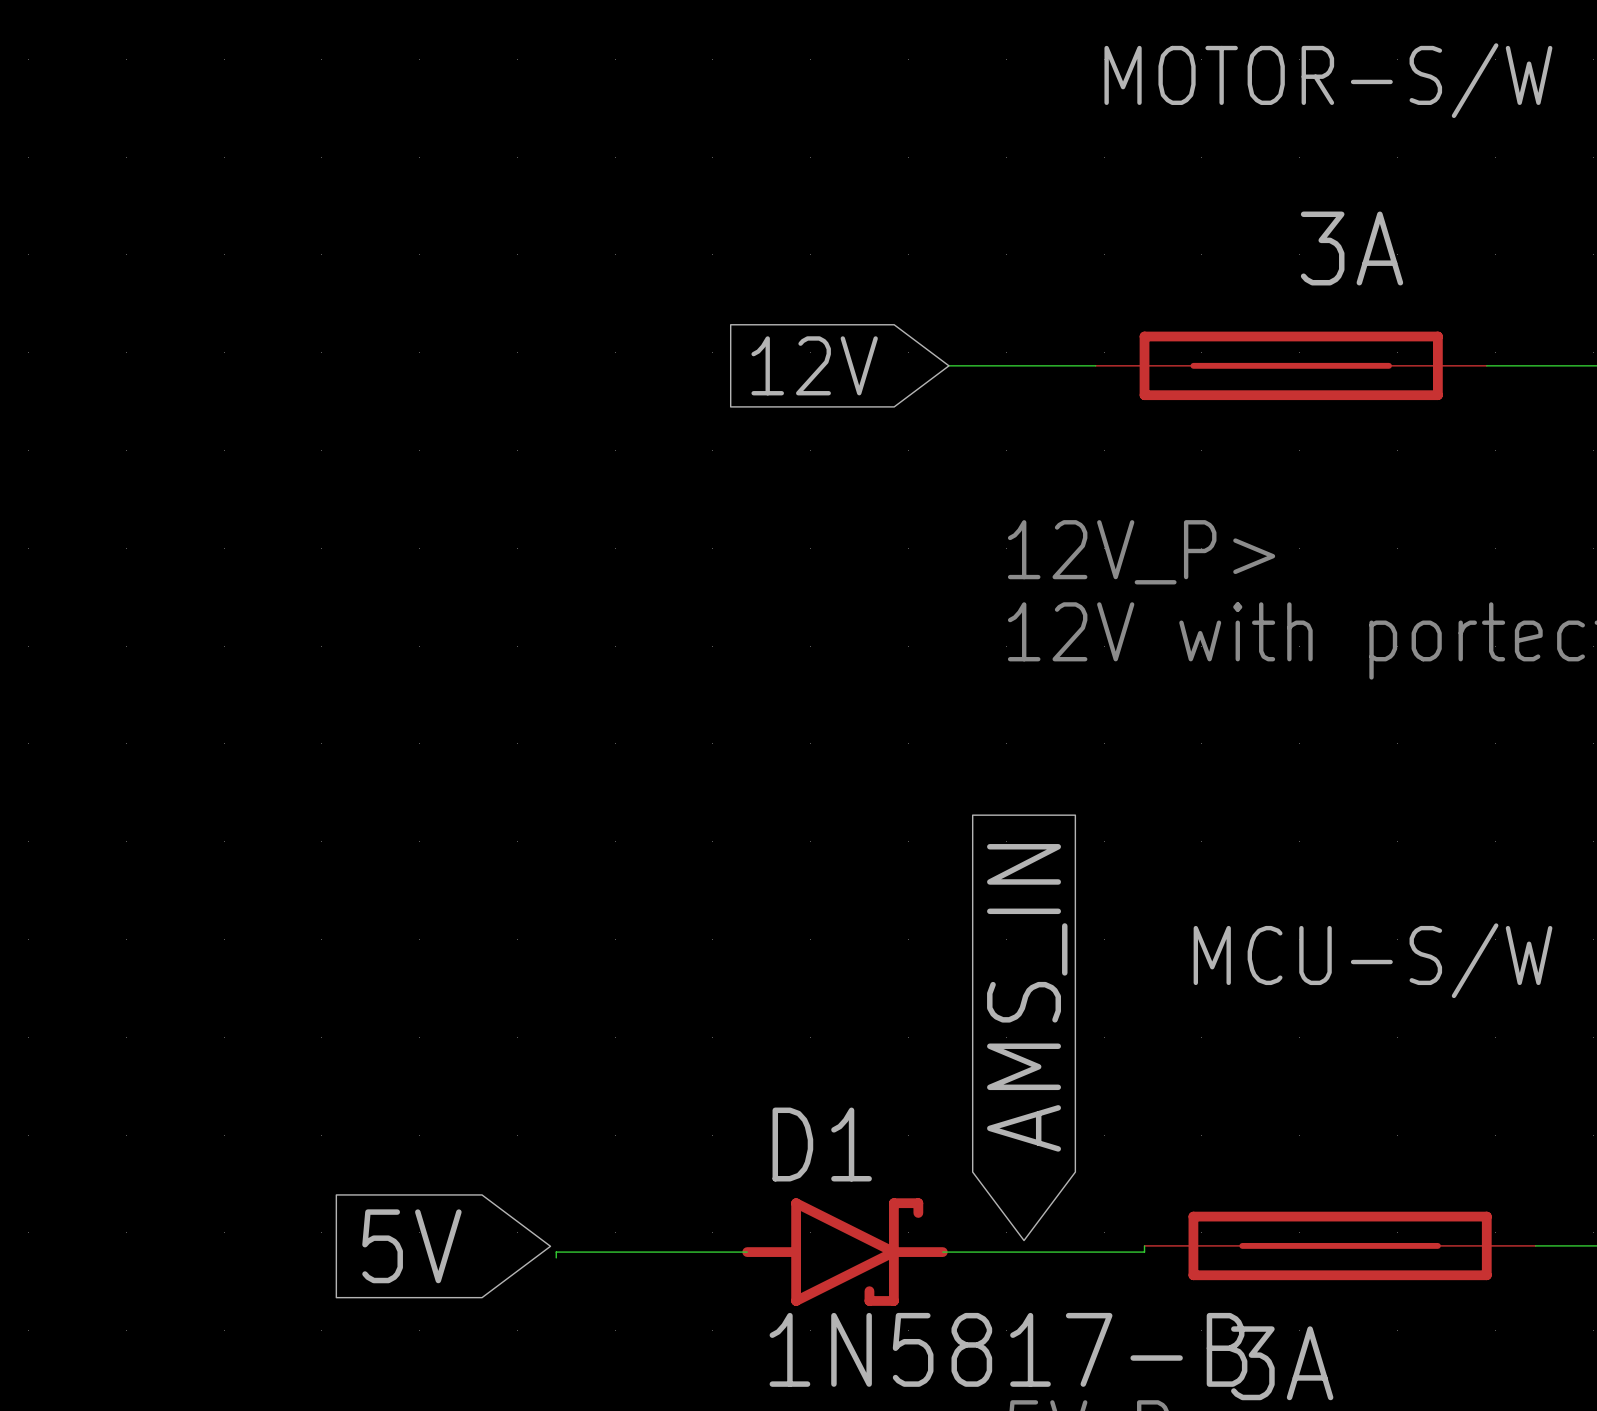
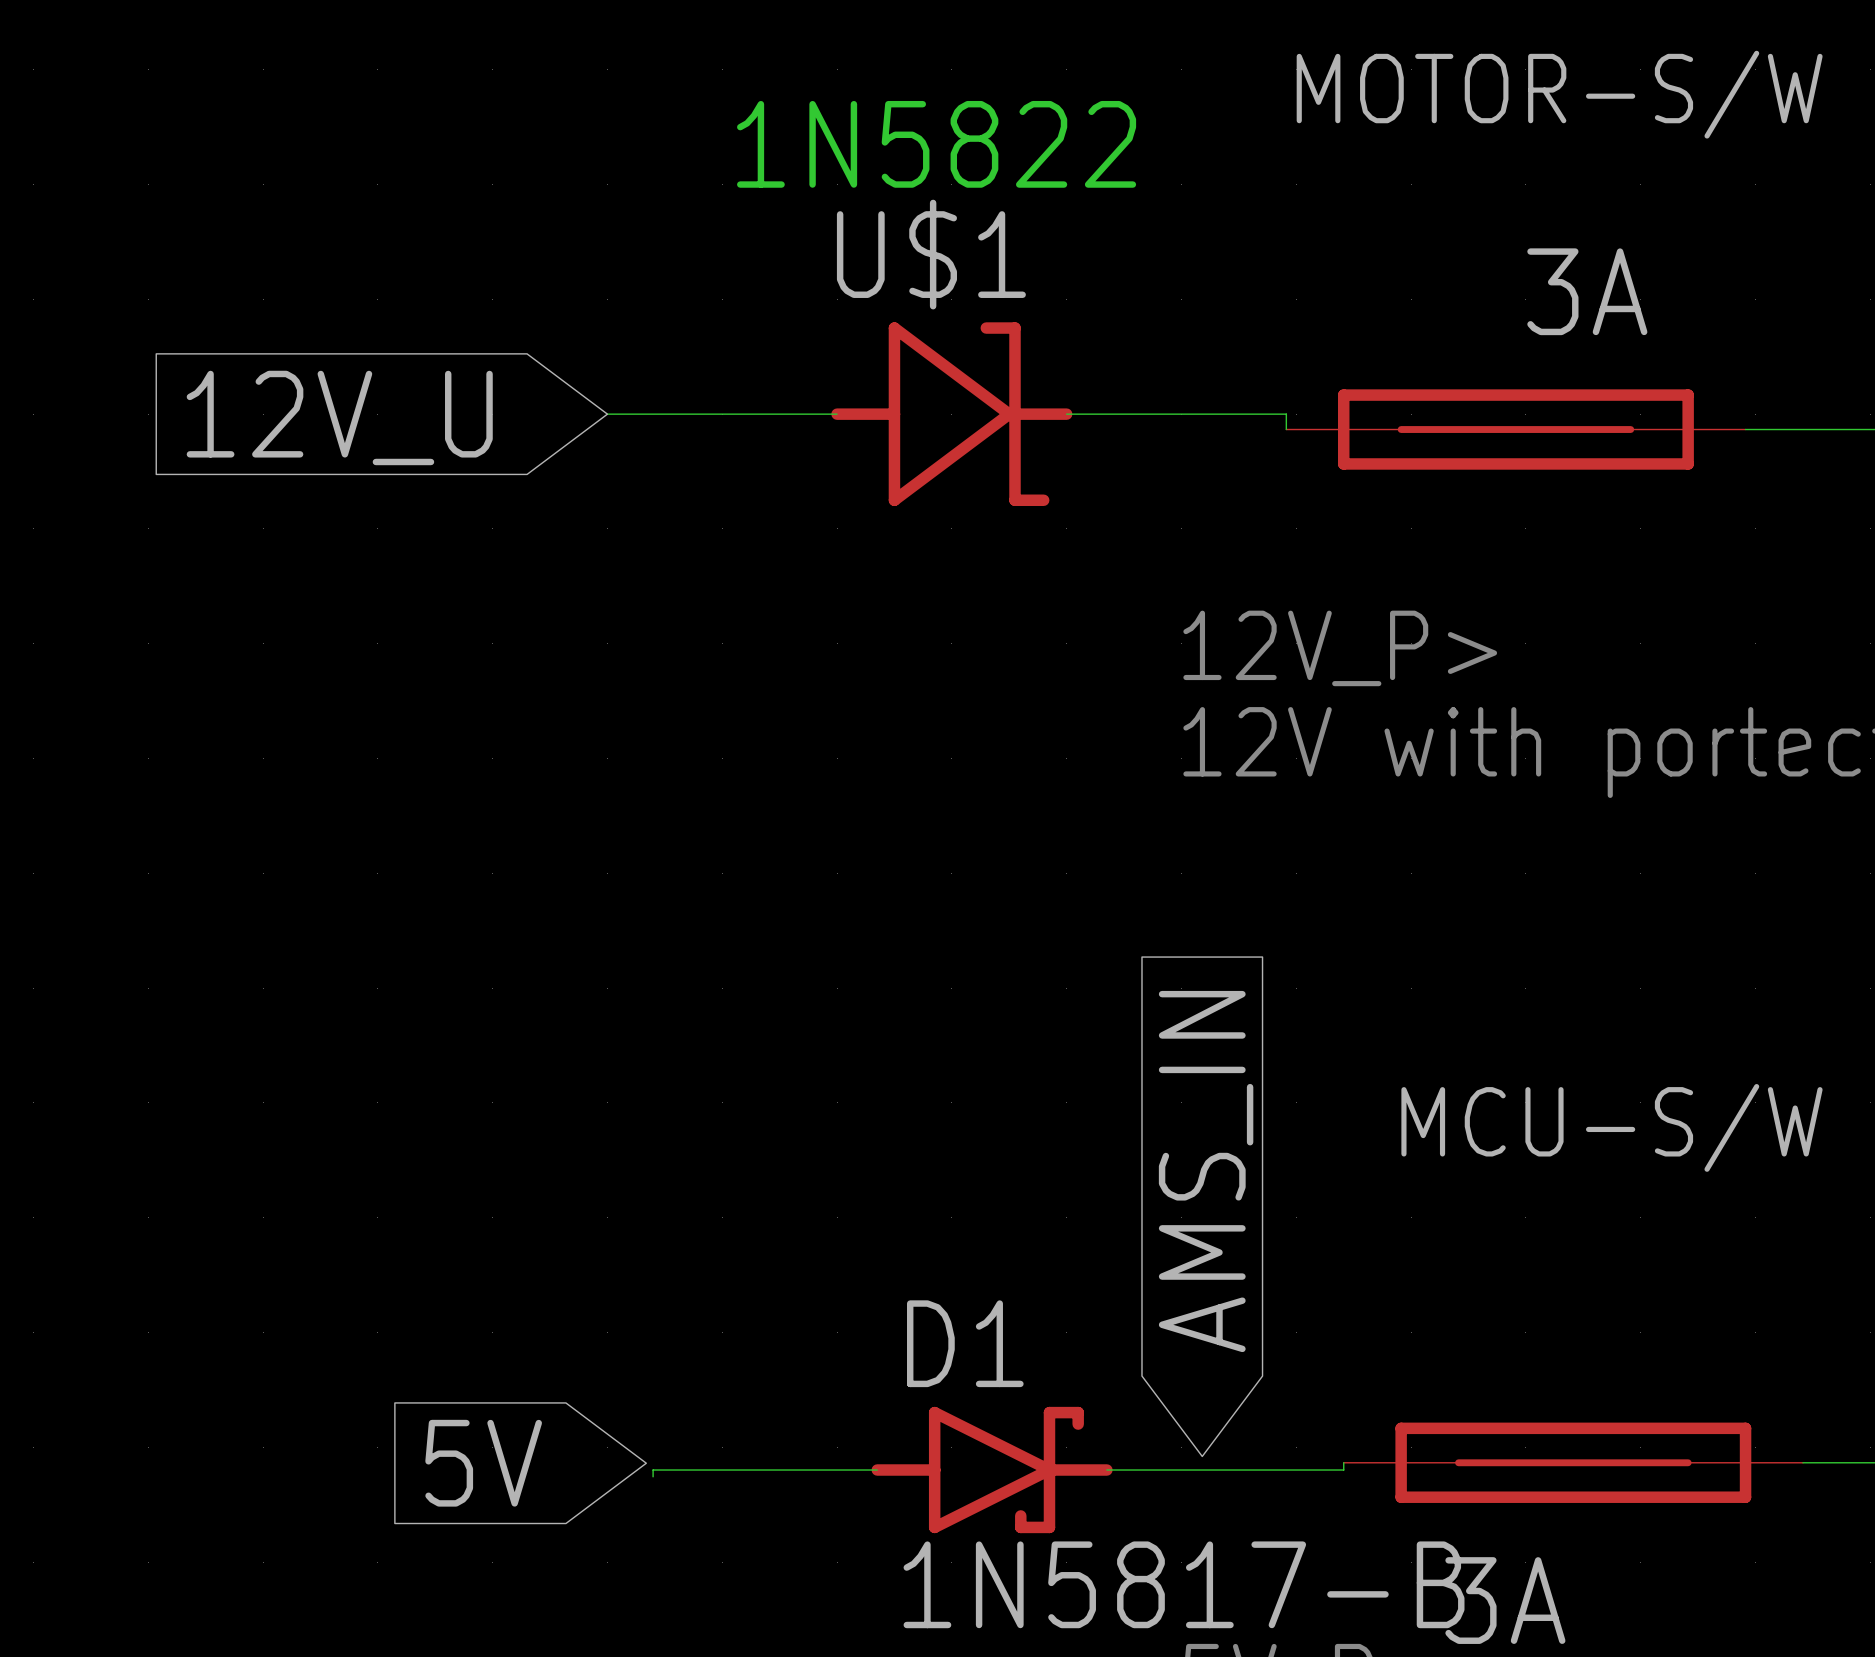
text: none -> 1N5822 (936, 144)
wire: none -> (607, 414) (837, 414)
U$1: none -> (951, 414)
global label: none -> 12V_U (339, 417)
global label: 12V (814, 365) -> none
wire: (948, 365) (1095, 365) -> (1066, 414) (1286, 414) (1286, 429)

